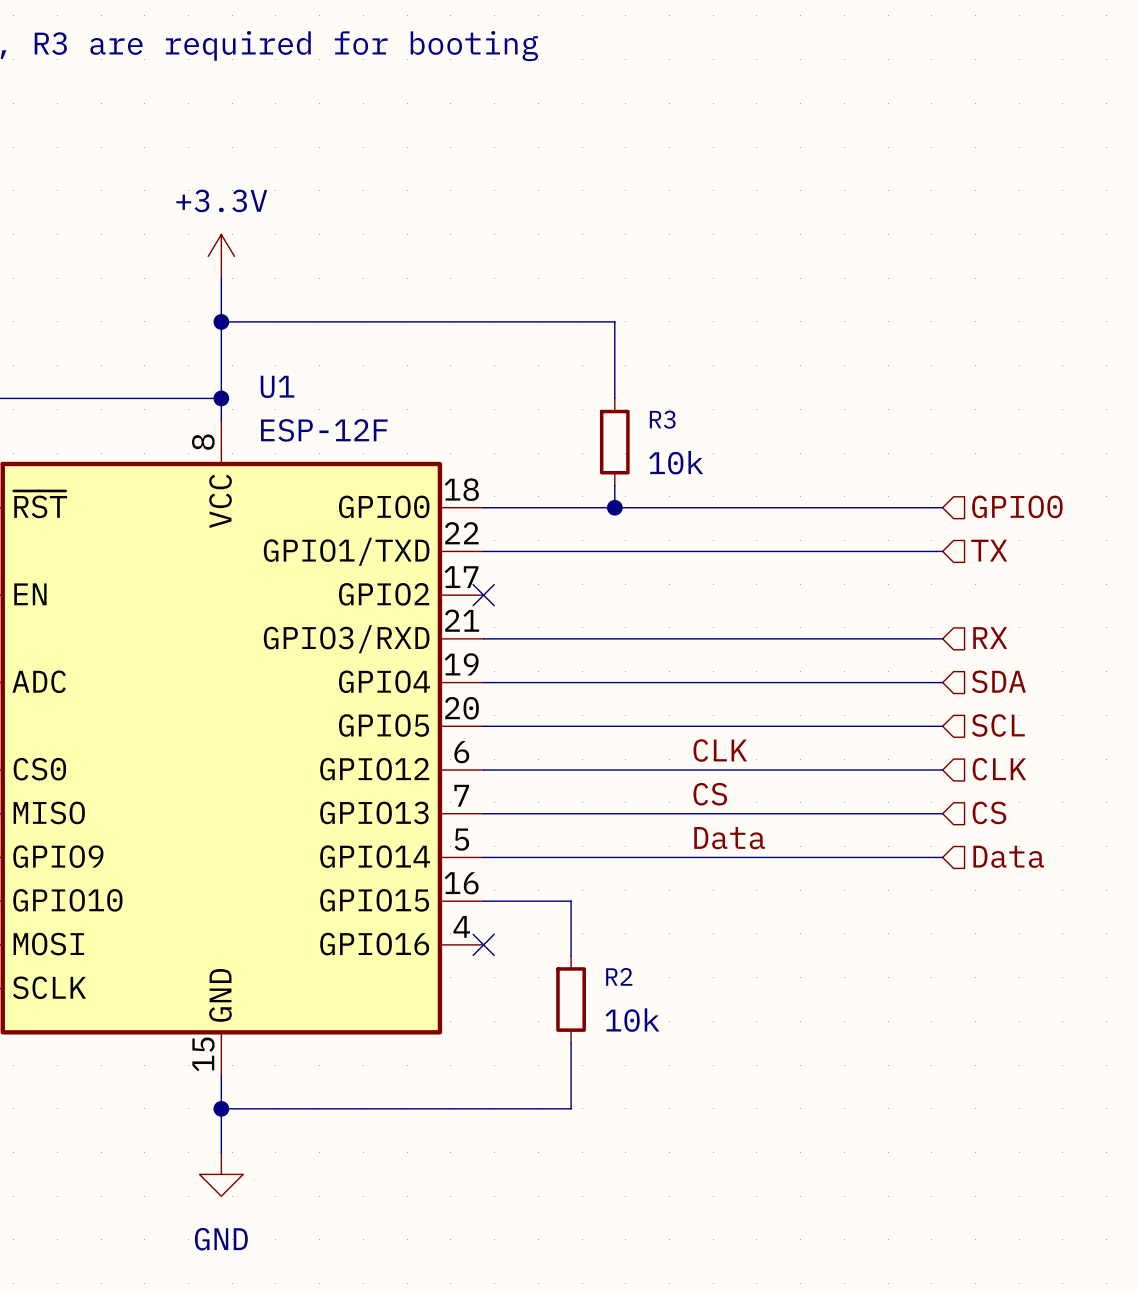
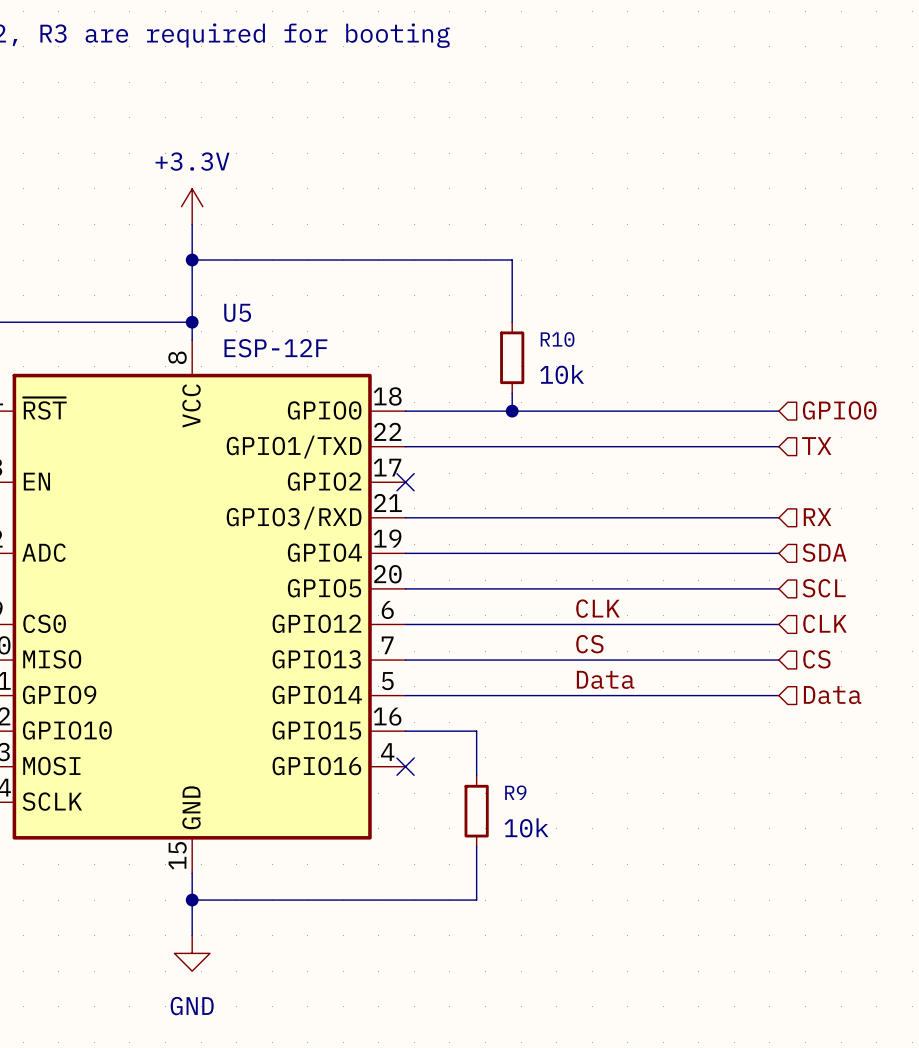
U1 name: U1 (277, 386) -> U5 (237, 312)
R3 name: R3 (662, 419) -> R10 (557, 339)
R2 name: R2 (619, 976) -> R9 (515, 792)

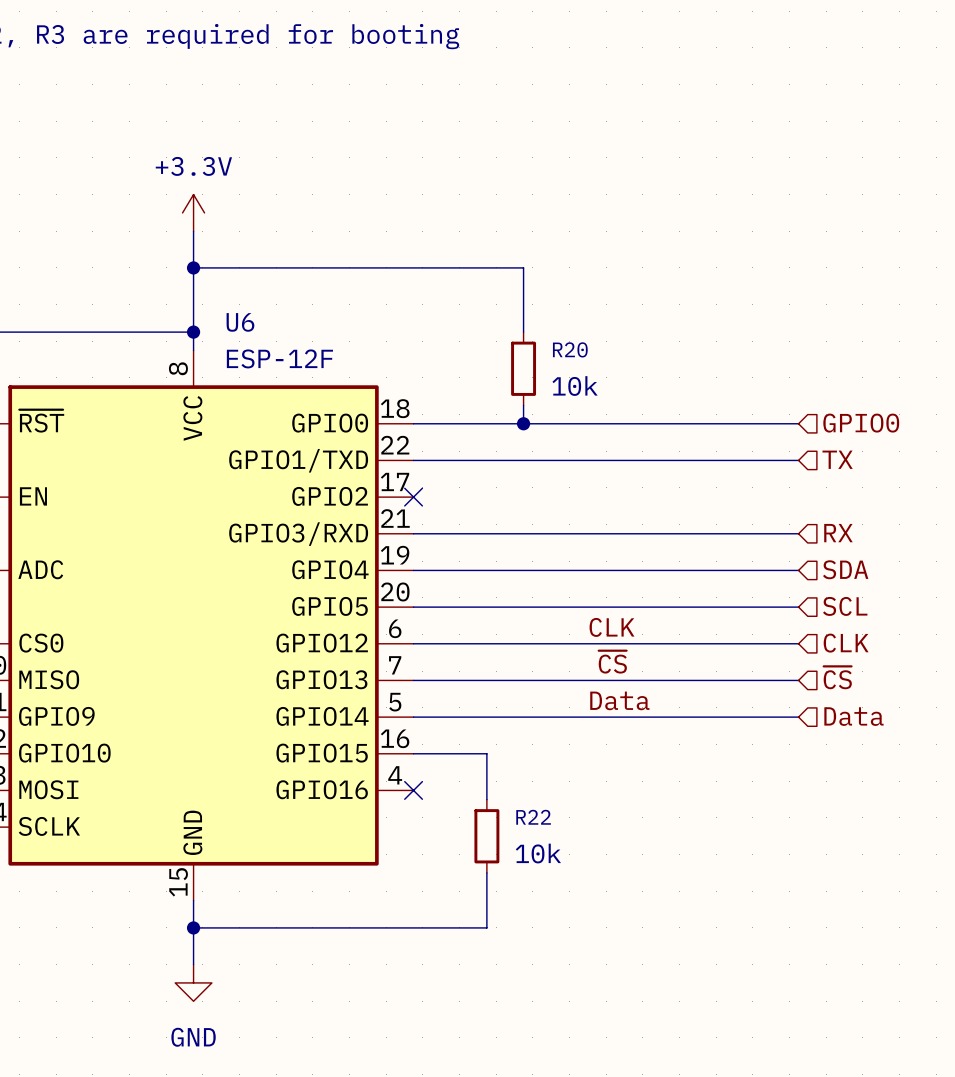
U5 name: U5 (237, 312) -> U6 (240, 322)
R10 name: R10 (557, 339) -> R20 (570, 349)
label: CS (589, 644) -> ~{CS} (612, 662)
hierarchical label: CS (816, 659) -> ~{CS} (837, 677)
R9 name: R9 (515, 792) -> R22 (533, 817)

